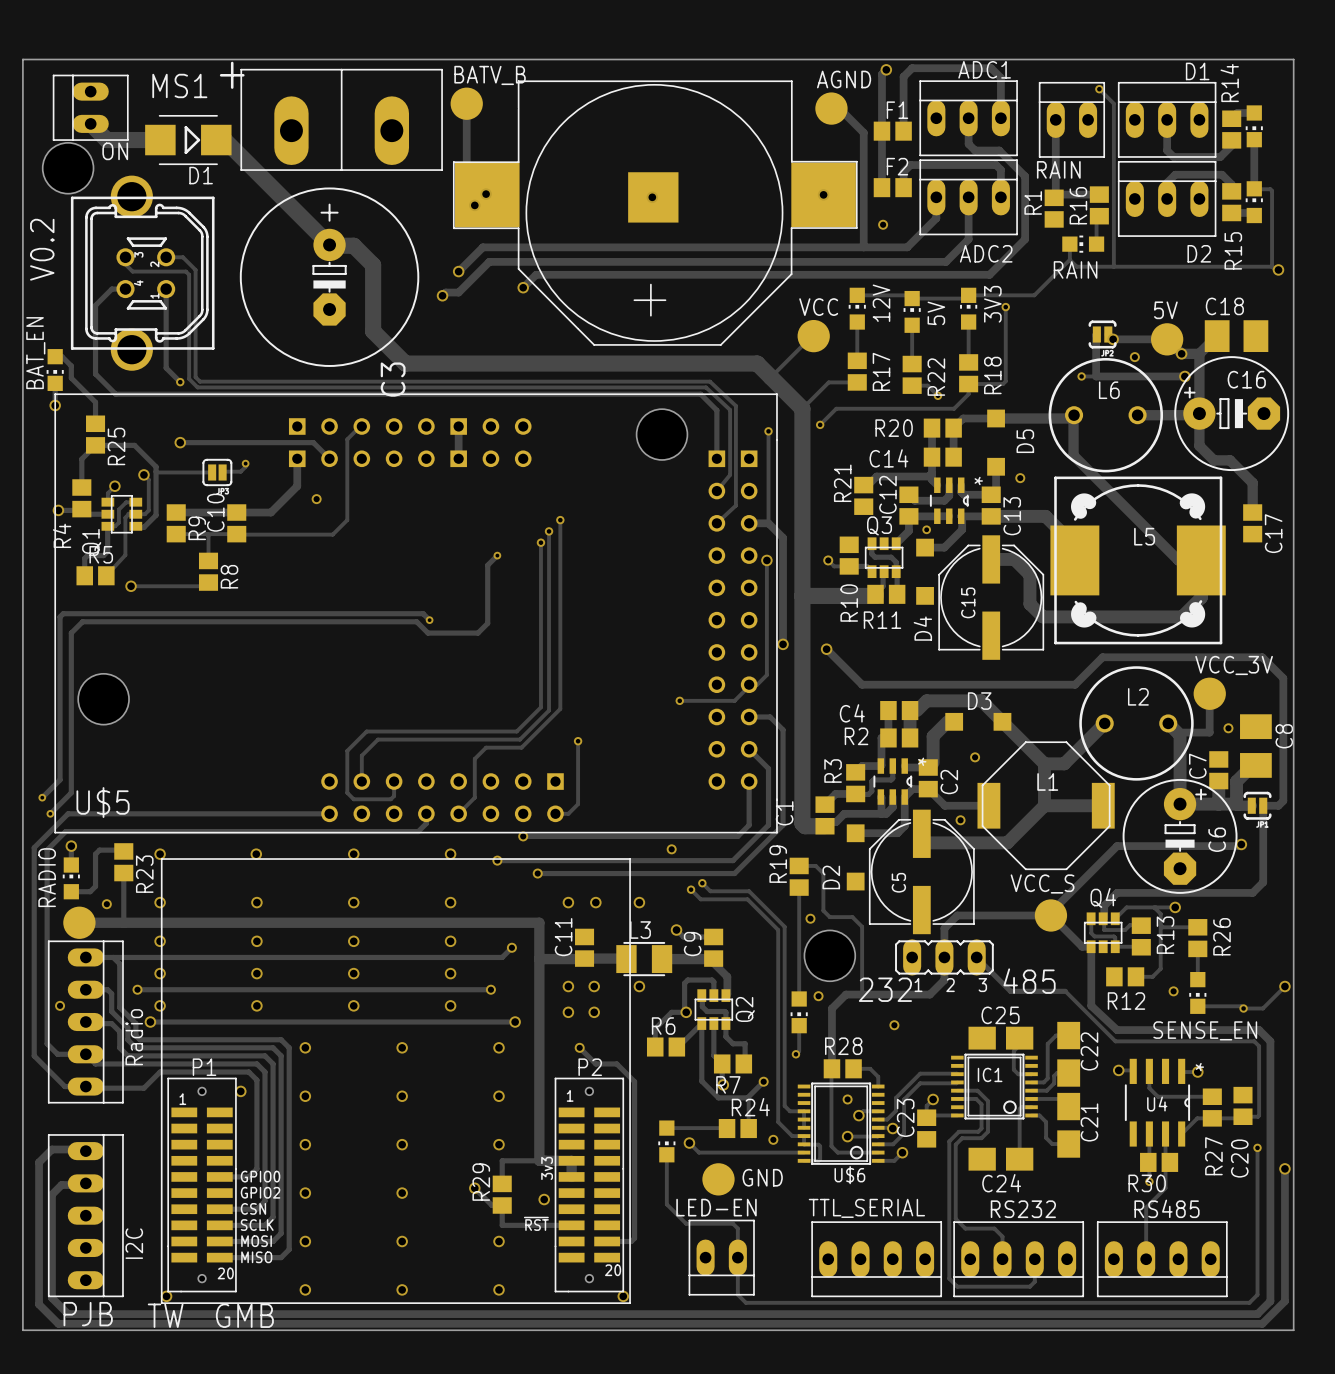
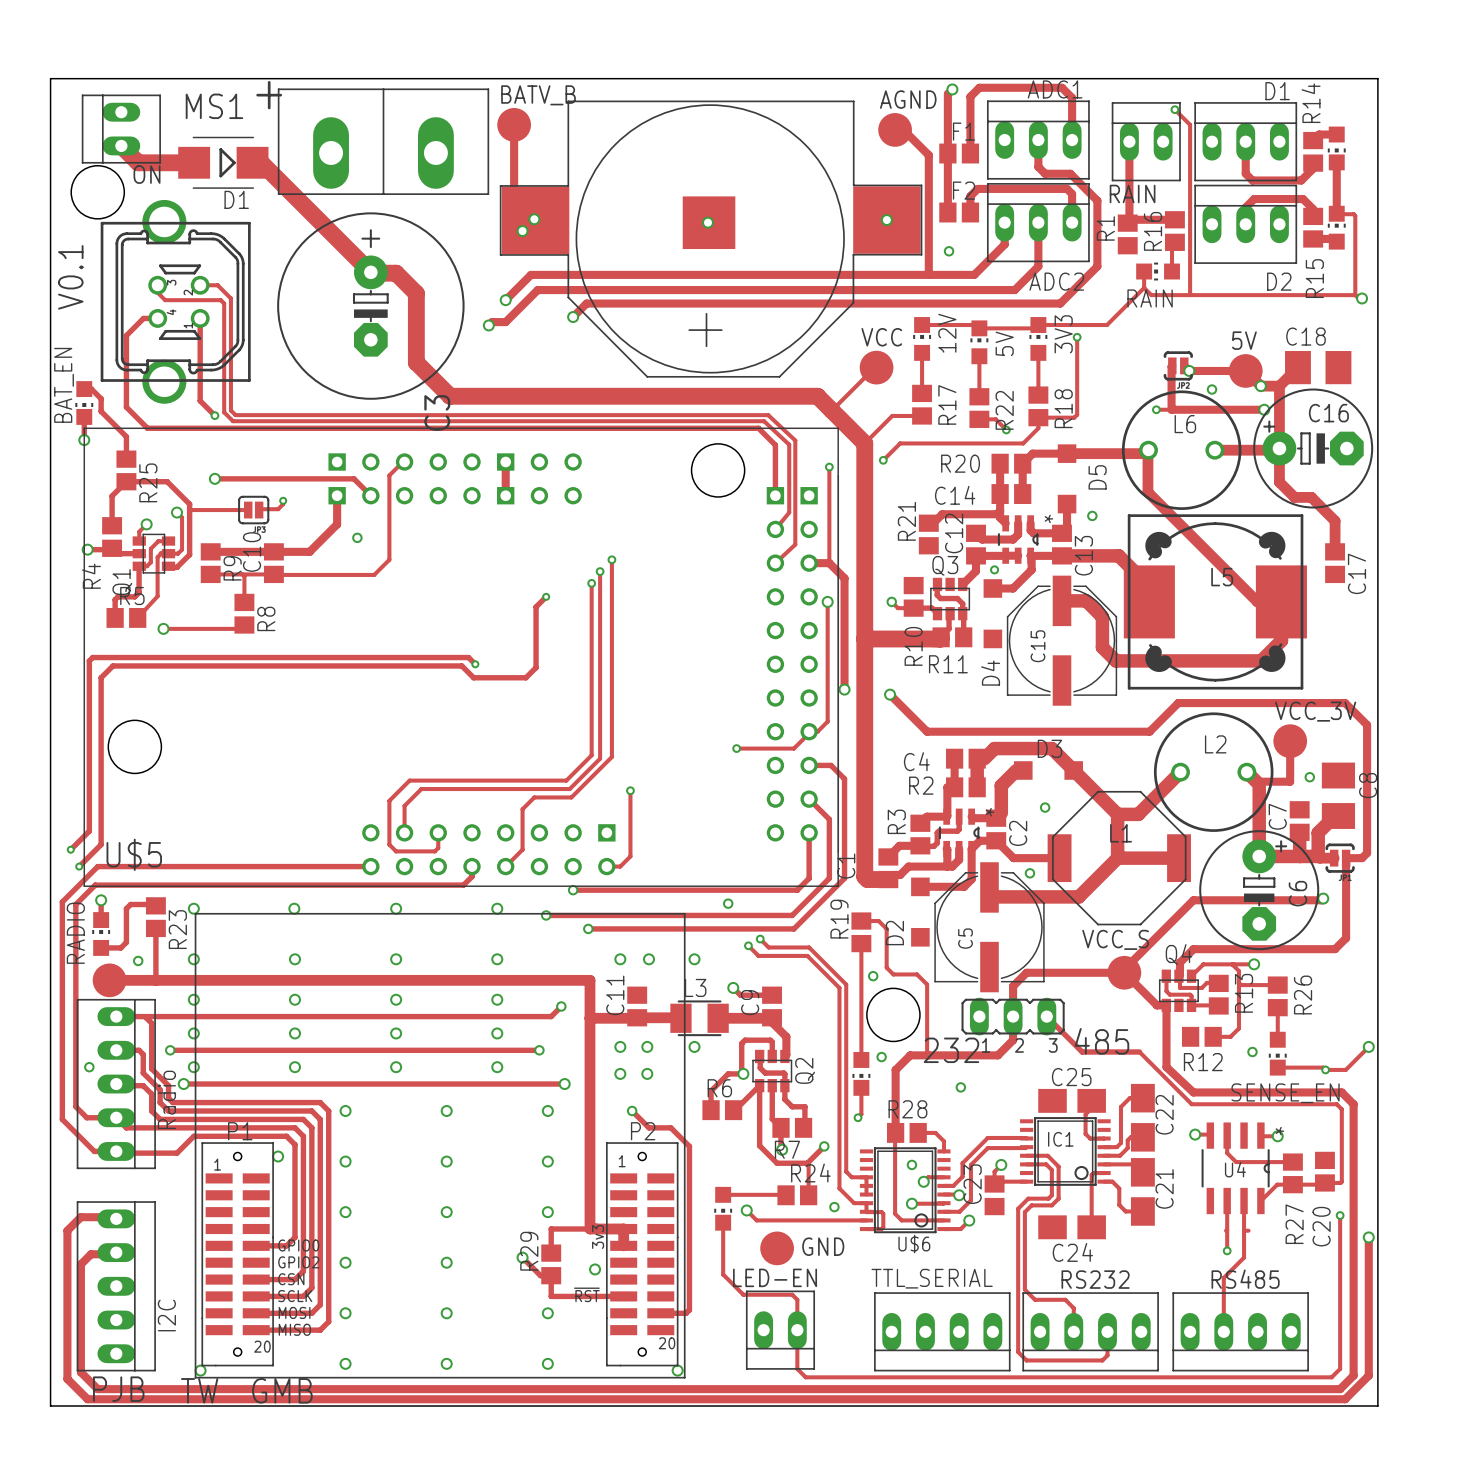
text: V0.2 (42, 249) -> V0.1 (70, 277)
R30: (1159, 1162) -> none

